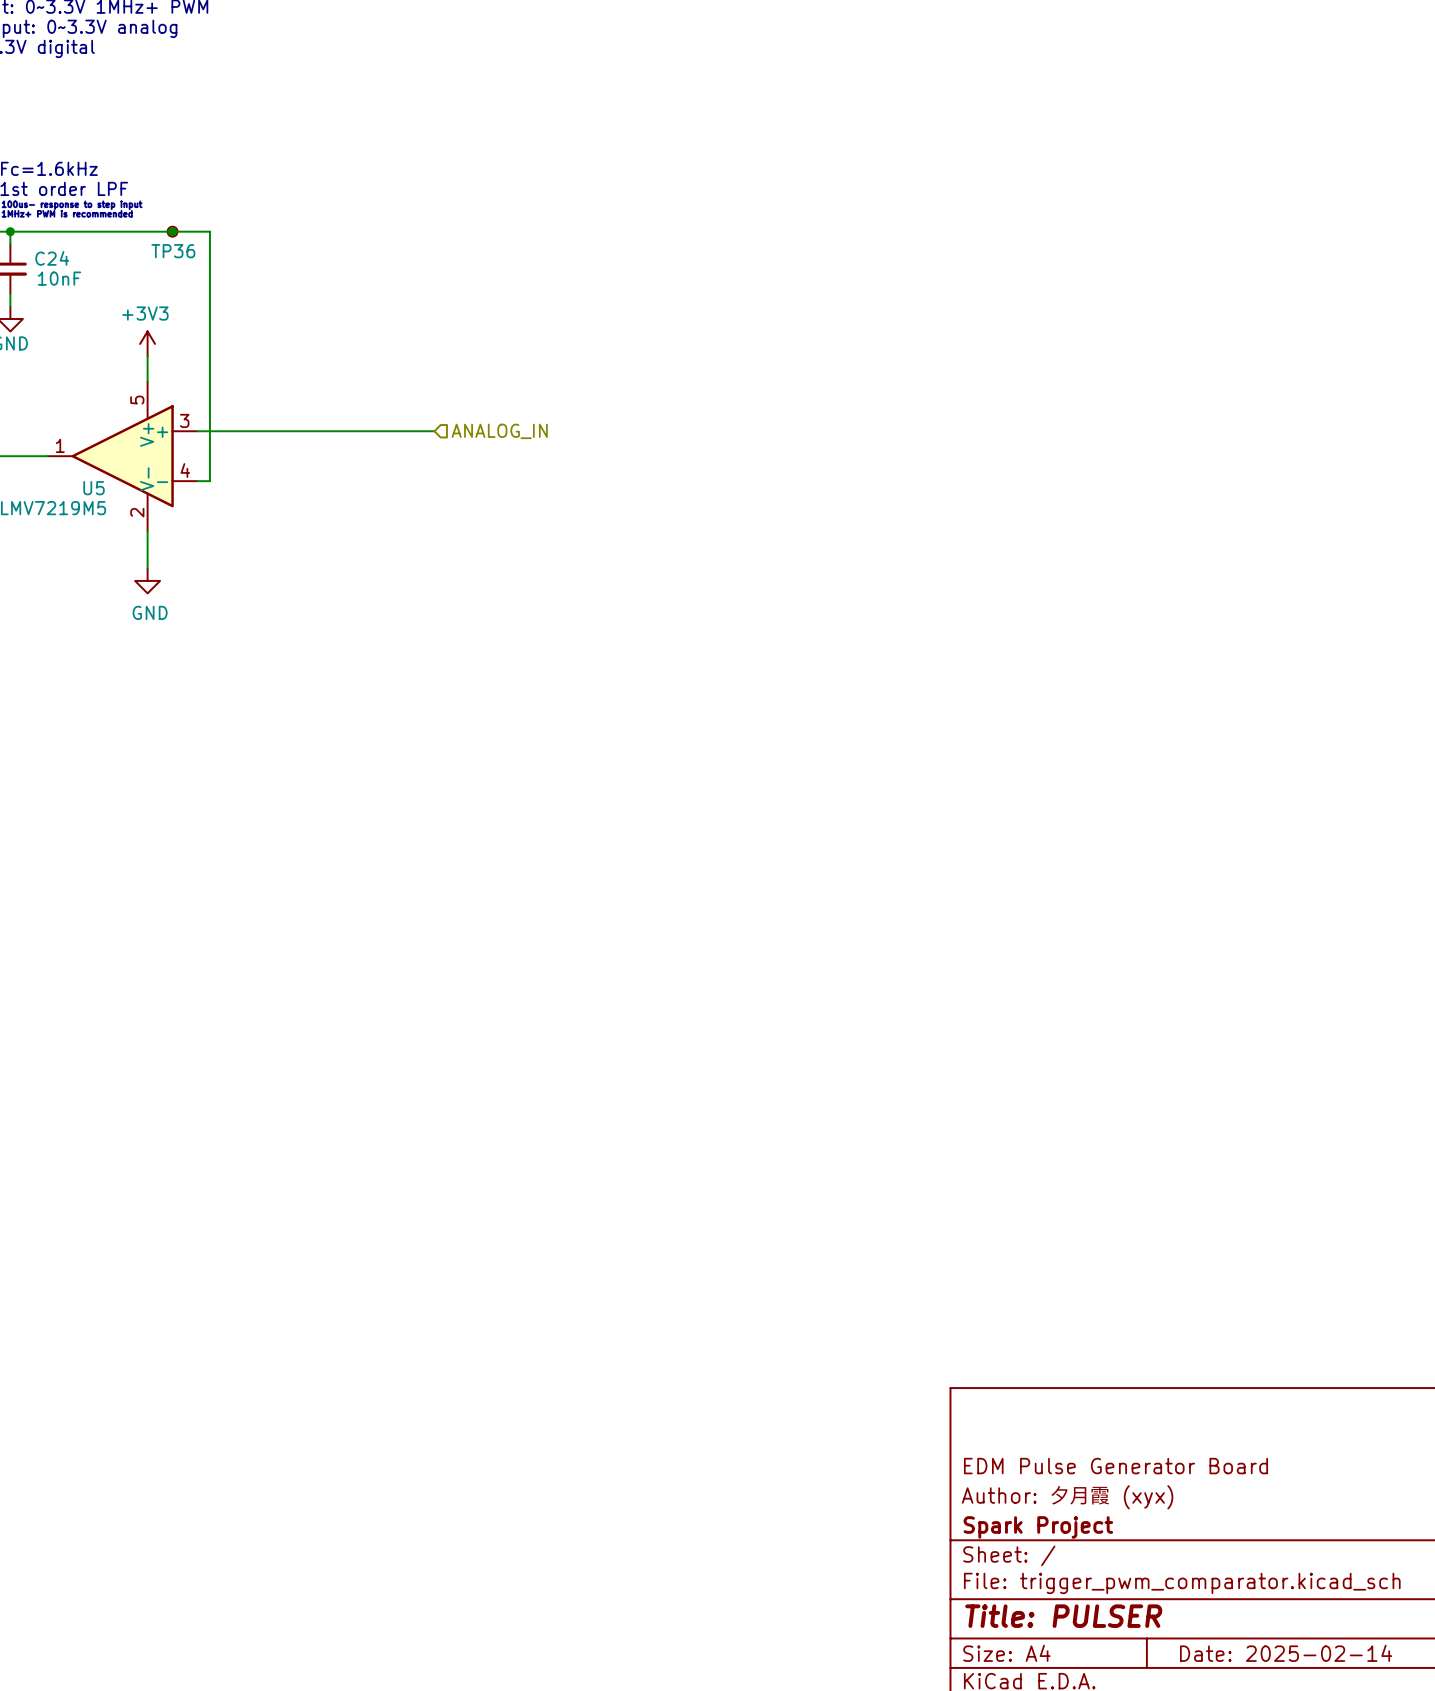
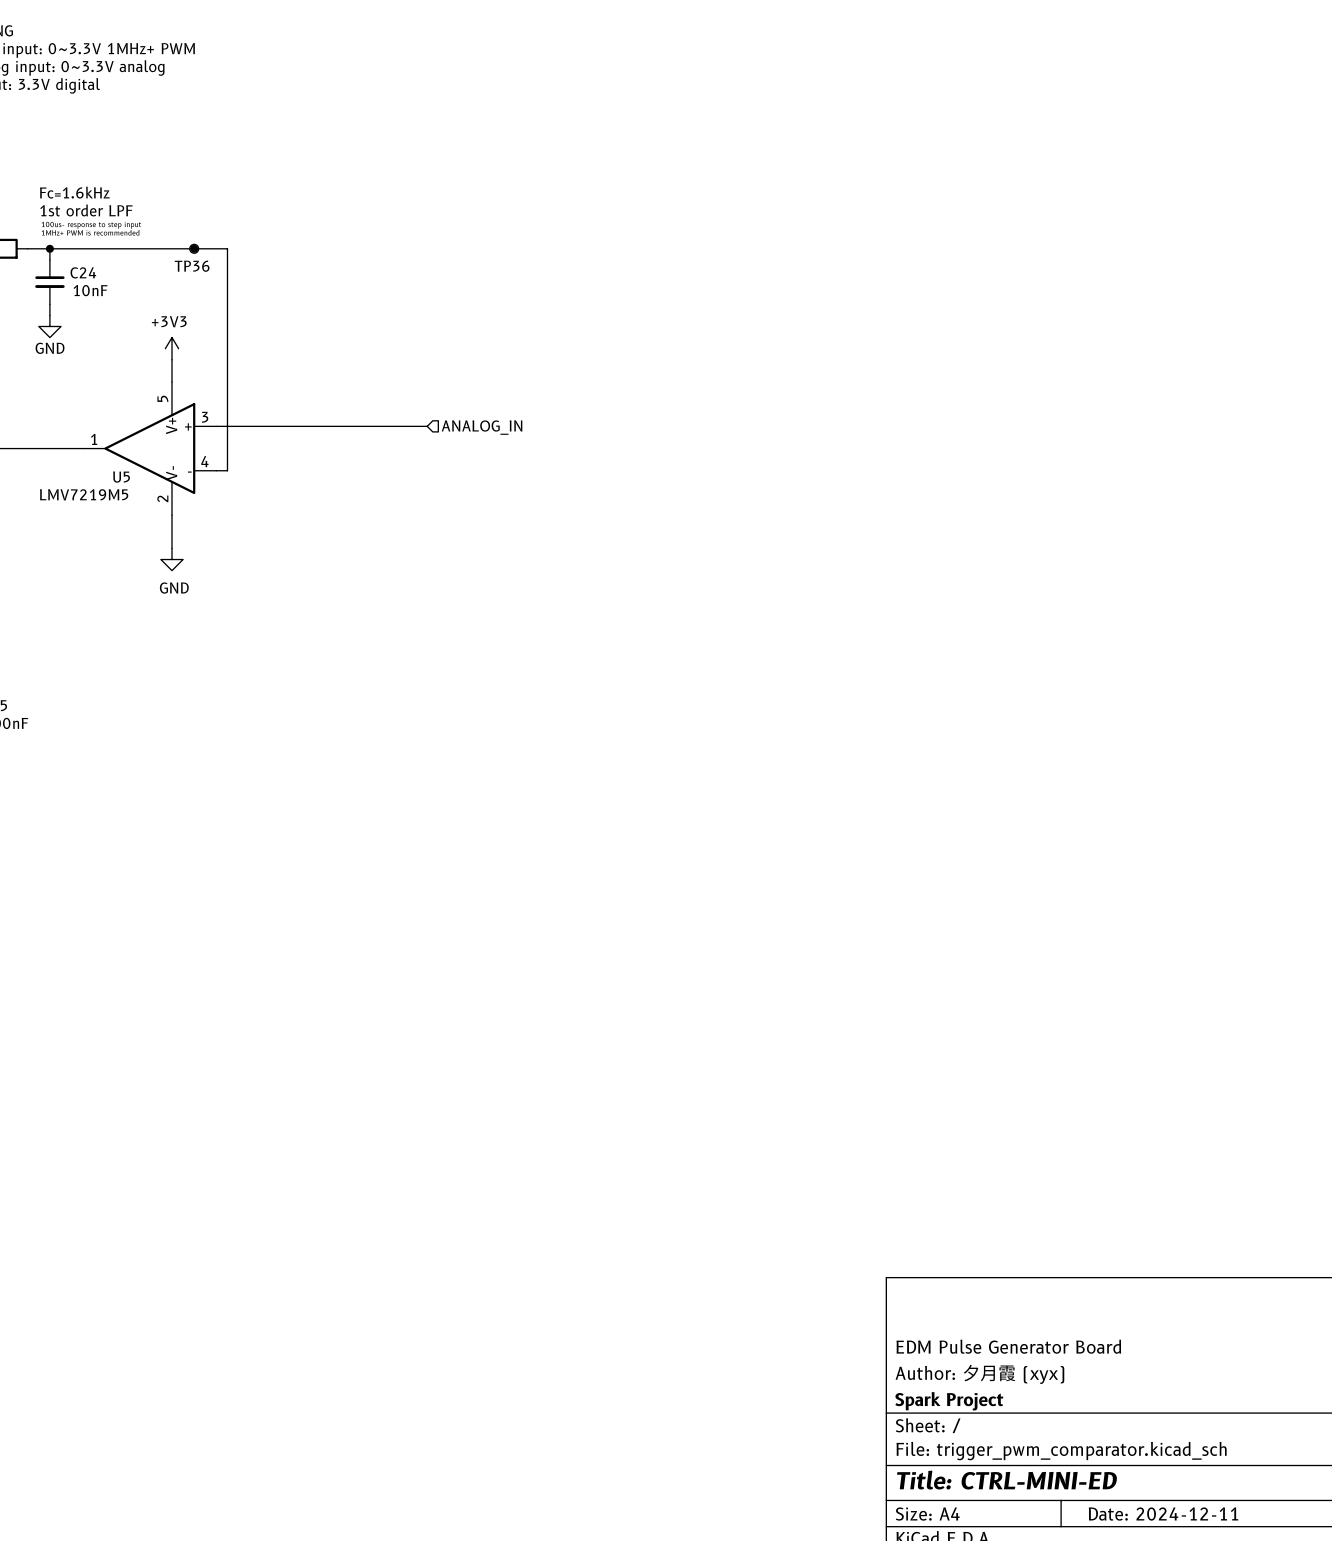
title block: Title: PULSER (1063, 1616) -> Title: CTRL-MINI-ED (1007, 1480)
title block: Date: 2025-02-14 (1286, 1653) -> Date: 2024-12-11 (1163, 1514)

